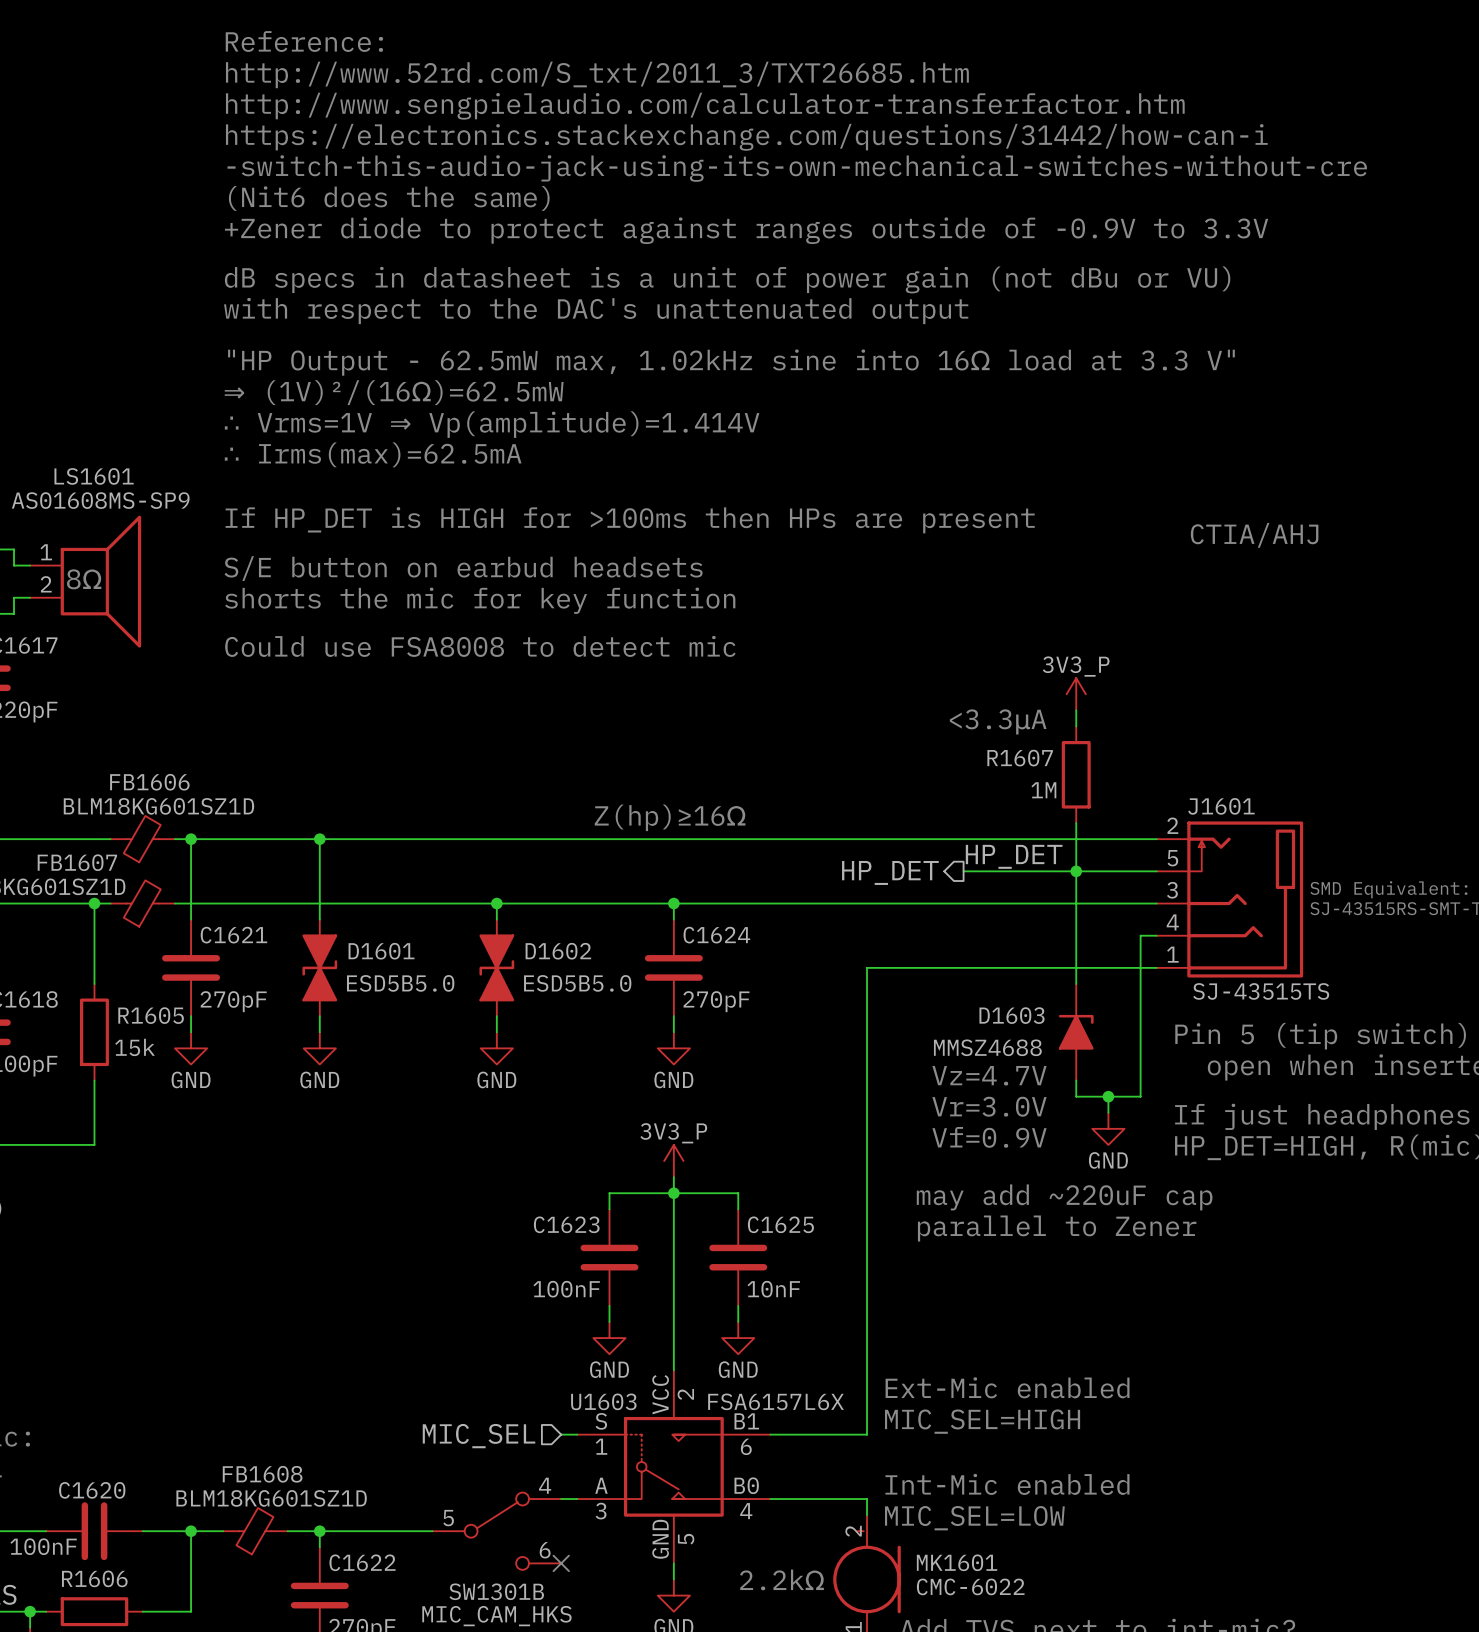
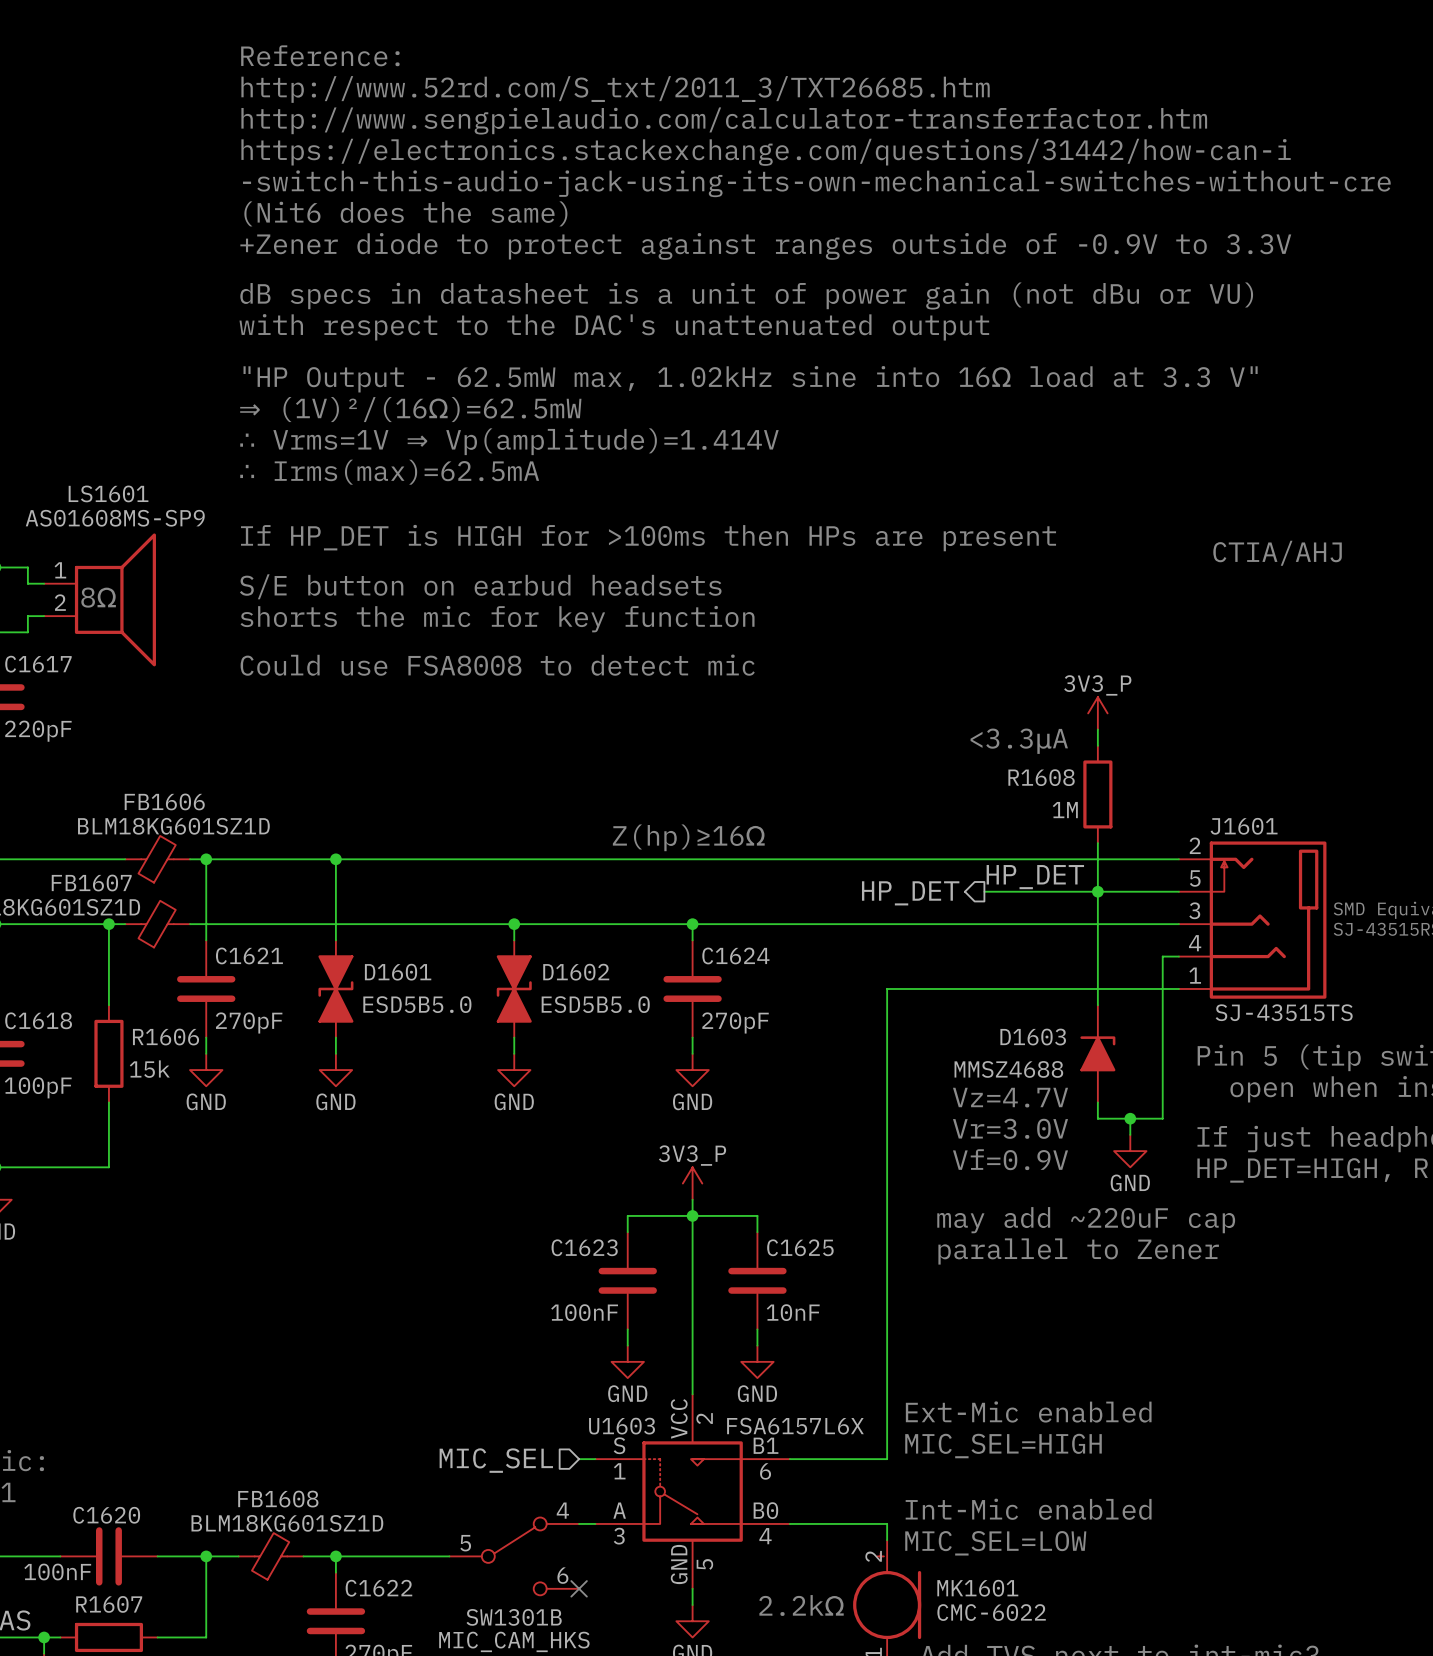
R1607 name: R1607 (1020, 758) -> R1608 (1041, 777)
R1605 name: R1605 (151, 1015) -> R1606 (166, 1037)
R1606 name: R1606 (94, 1578) -> R1607 (109, 1604)

